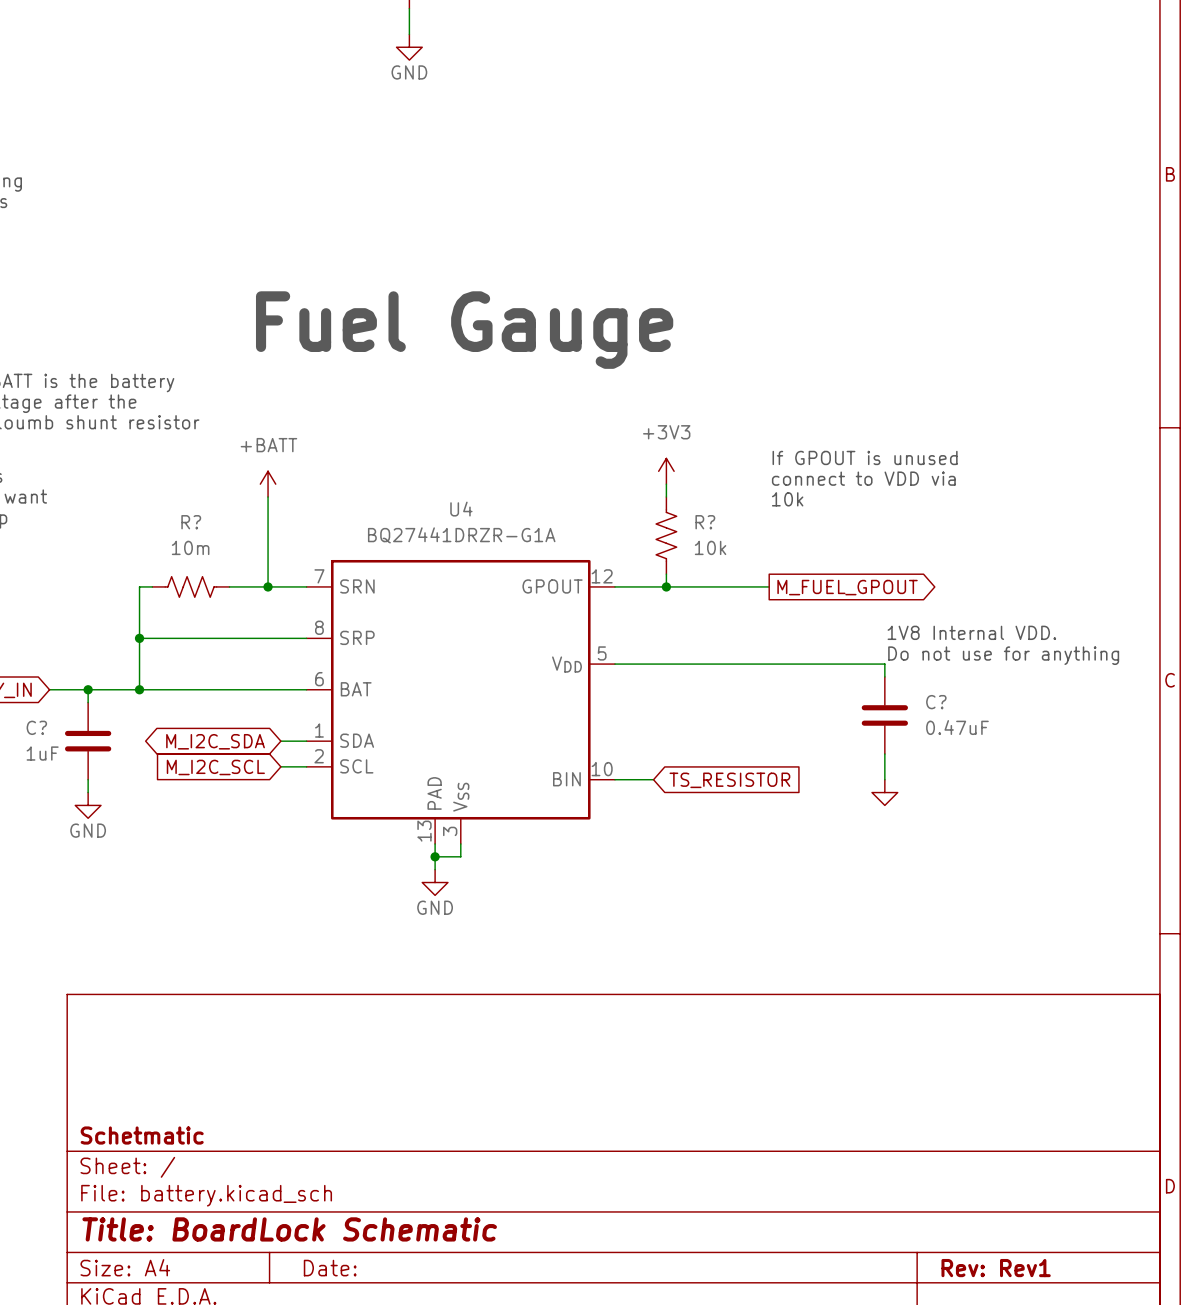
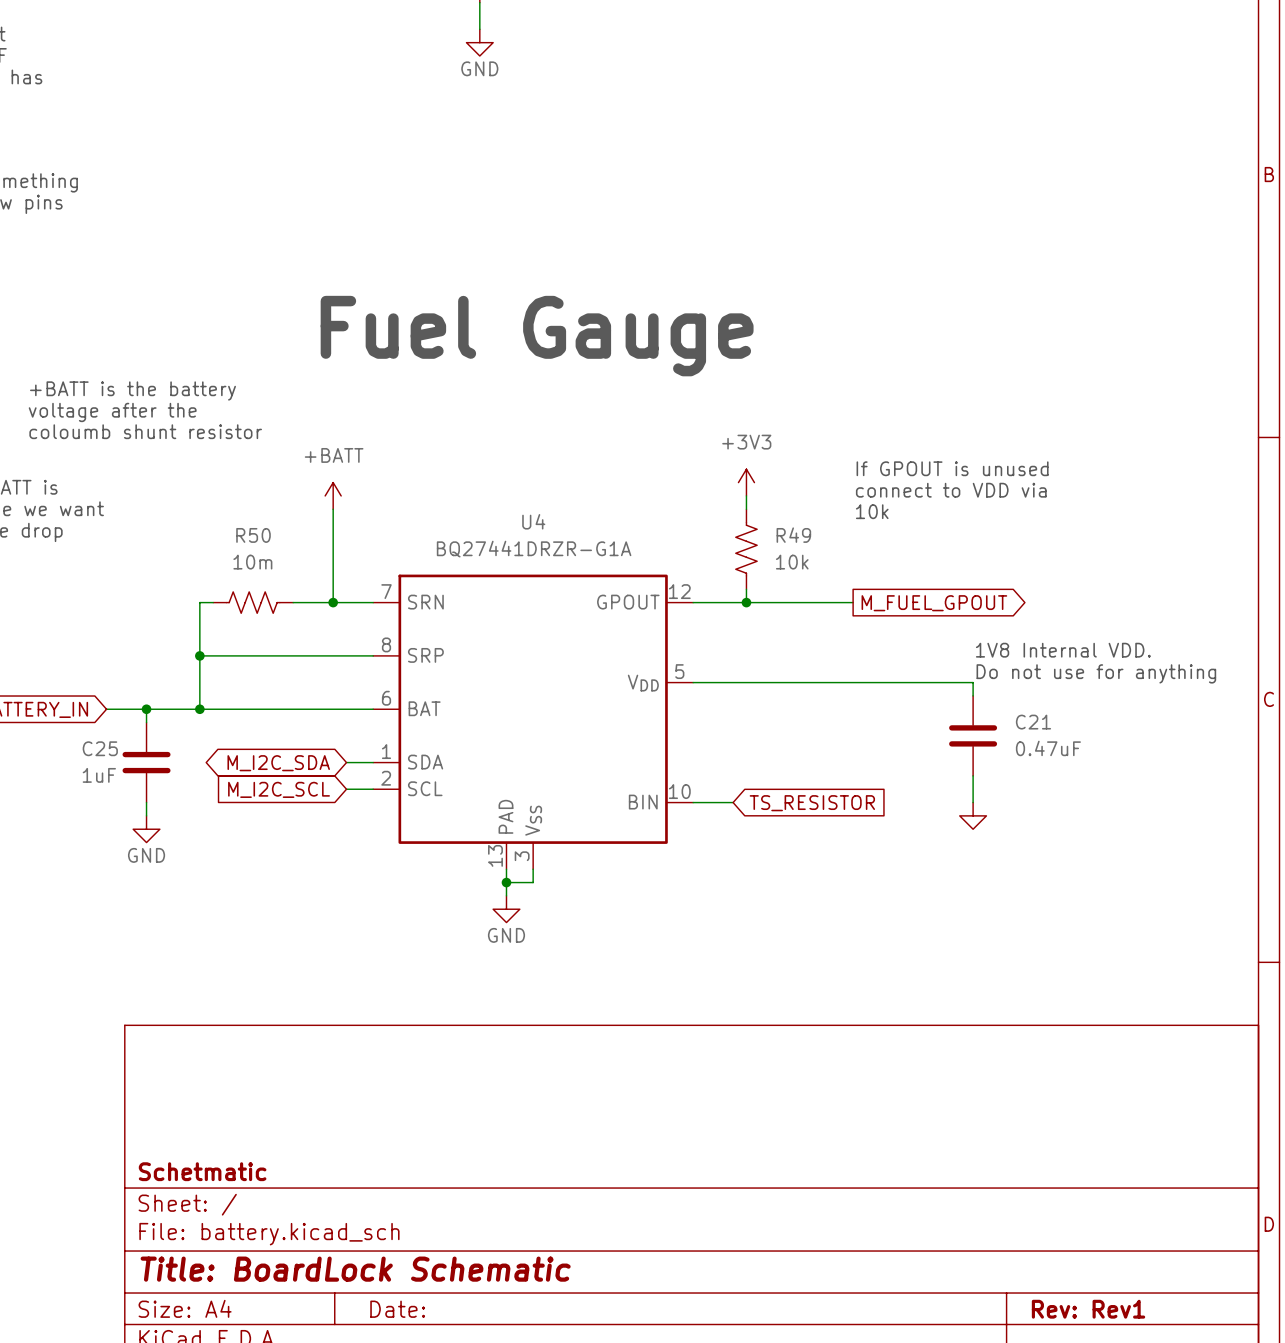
R? name: R? (191, 522) -> R50 (253, 535)
R? name: R? (705, 522) -> R49 (793, 535)
C? name: C? (936, 702) -> C21 (1033, 722)
C? name: C? (36, 727) -> C25 (100, 748)

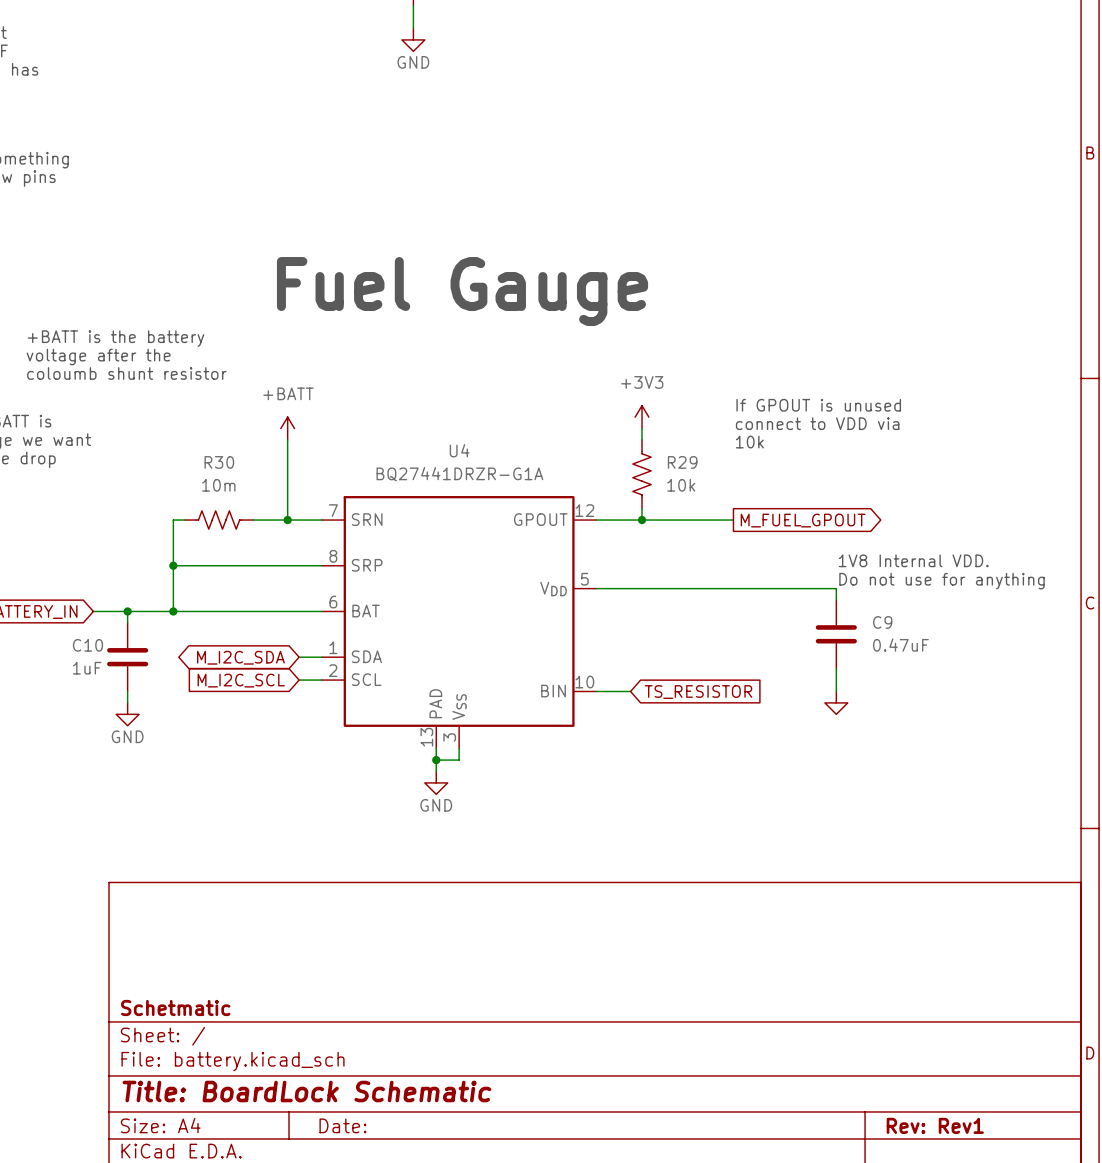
R50 name: R50 (253, 535) -> R30 (219, 462)
R49 name: R49 (793, 535) -> R29 (682, 462)
C21 name: C21 (1033, 722) -> C9 (882, 622)
C25 name: C25 (100, 748) -> C10 (87, 645)

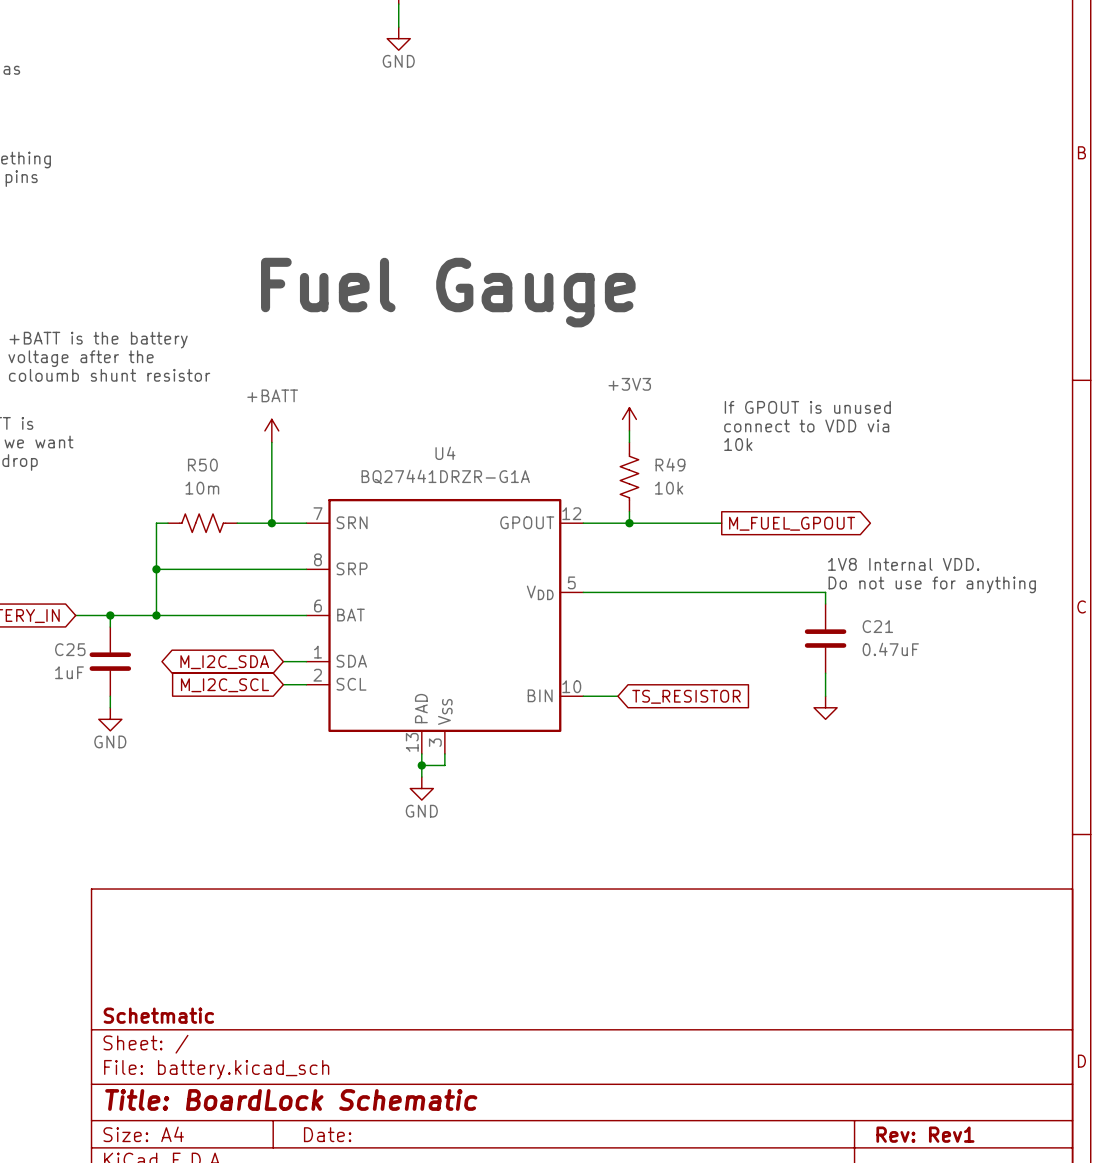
R30 name: R30 (219, 462) -> R50 (202, 465)
R29 name: R29 (682, 462) -> R49 (670, 464)
C9 name: C9 (882, 622) -> C21 (877, 626)
C10 name: C10 (87, 645) -> C25 (70, 649)

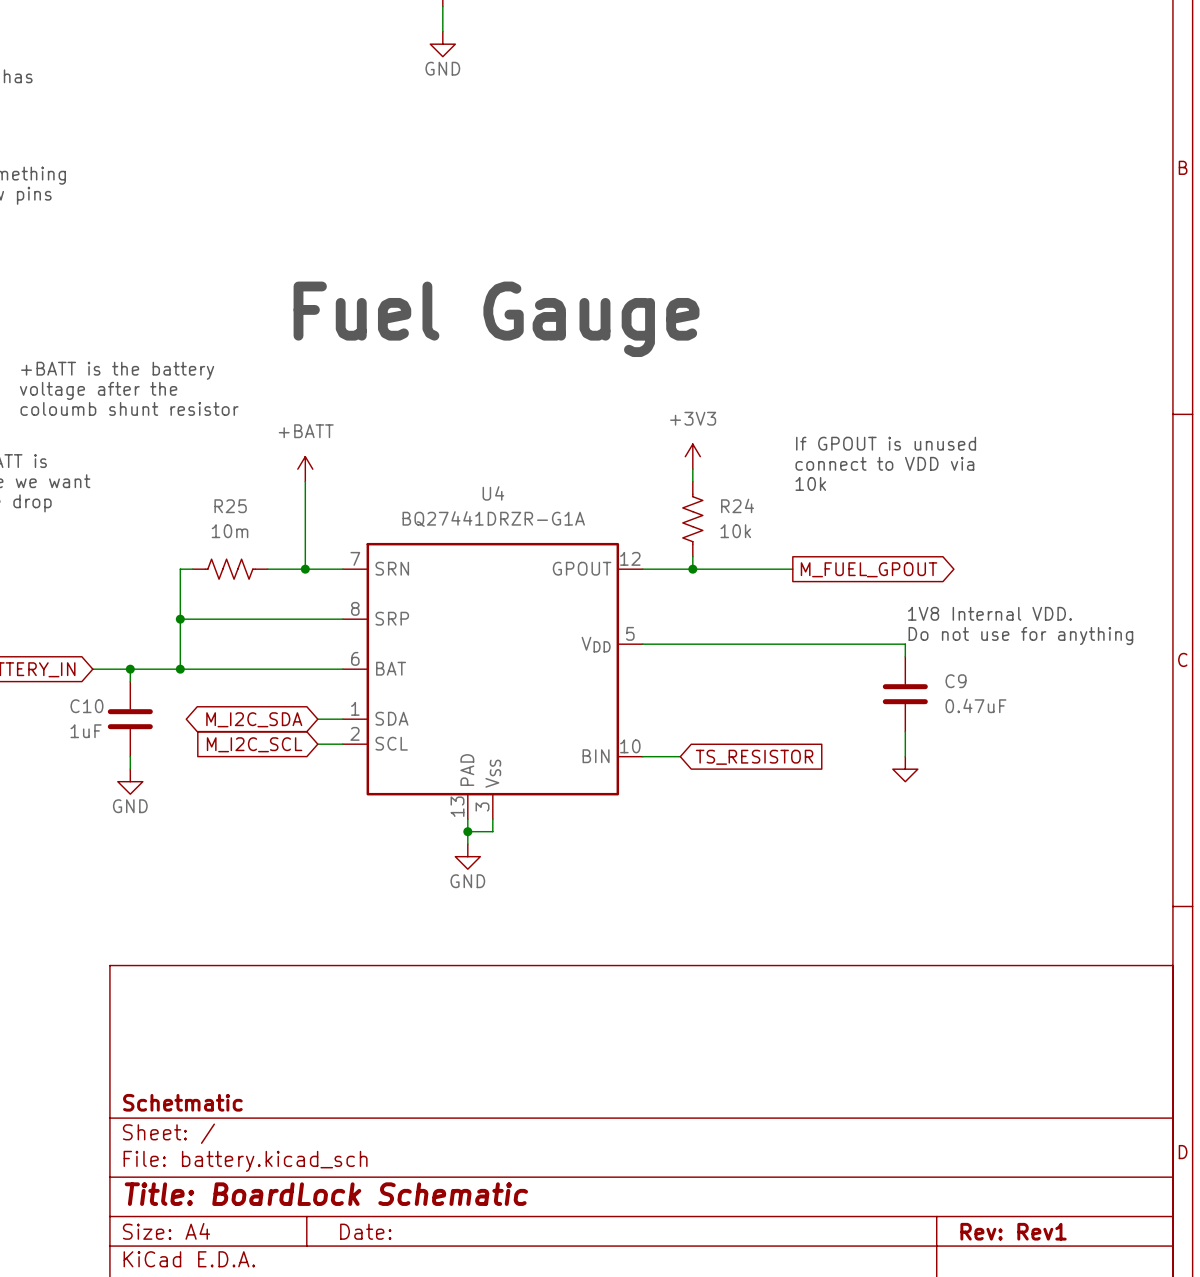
R49 name: R49 (670, 464) -> R24 (737, 505)
R50 name: R50 (202, 465) -> R25 (230, 506)
C21 name: C21 (877, 626) -> C9 (956, 681)
C25 name: C25 (70, 649) -> C10 (86, 706)

